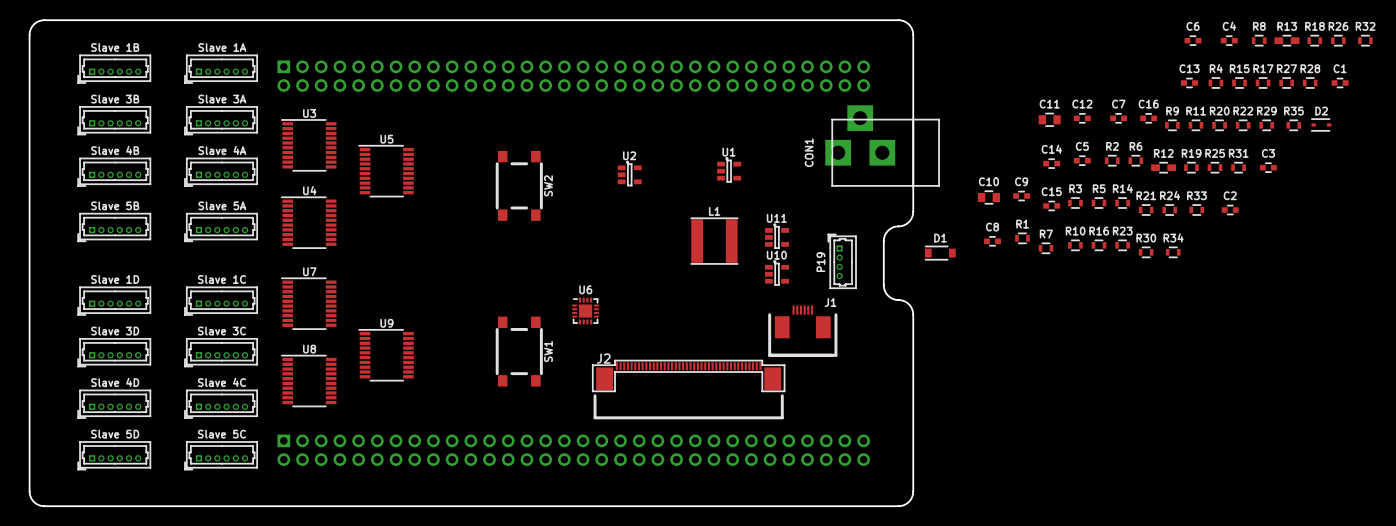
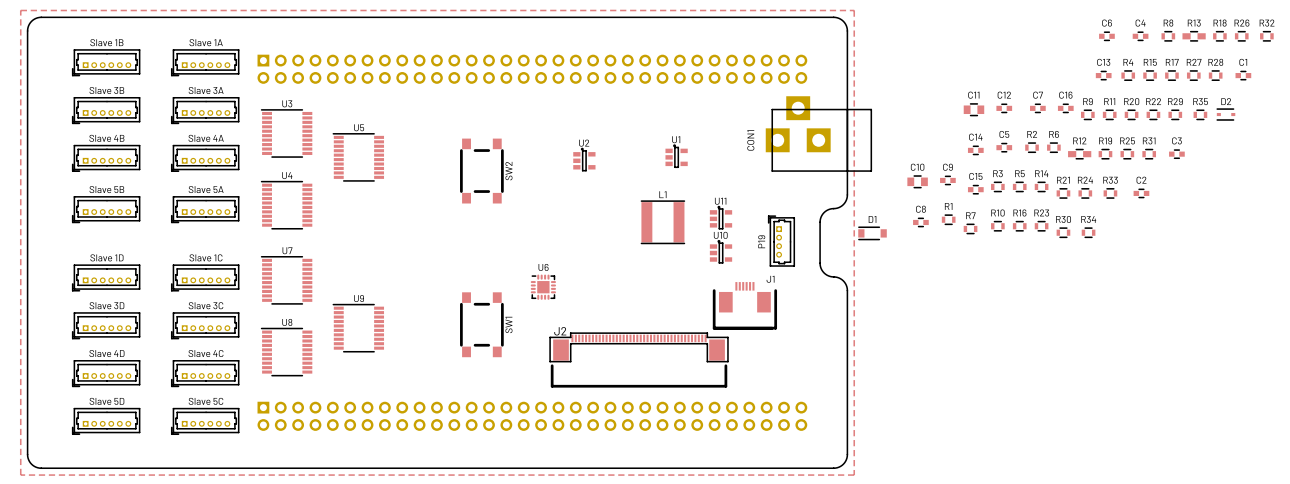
zone outline: none -> (20, 10) (854, 10) (854, 475) (20, 475) (20, 10)

